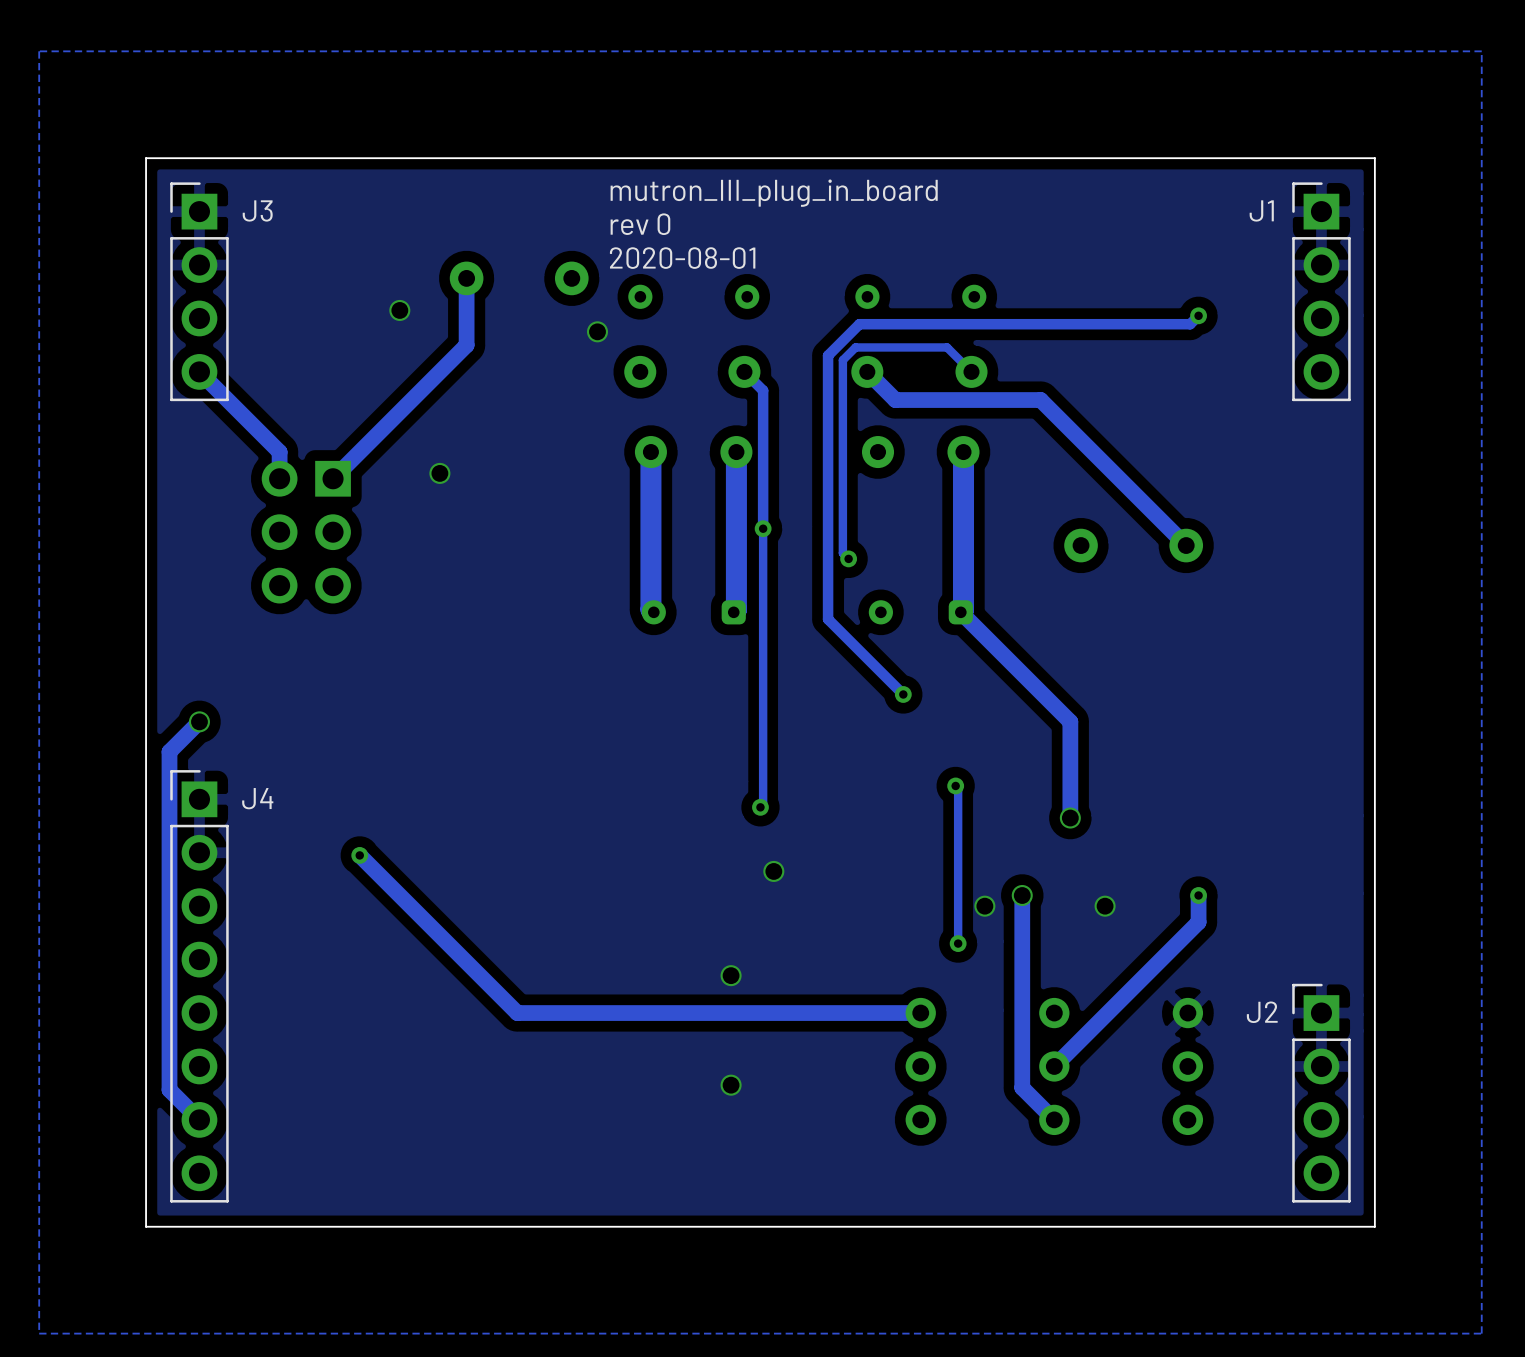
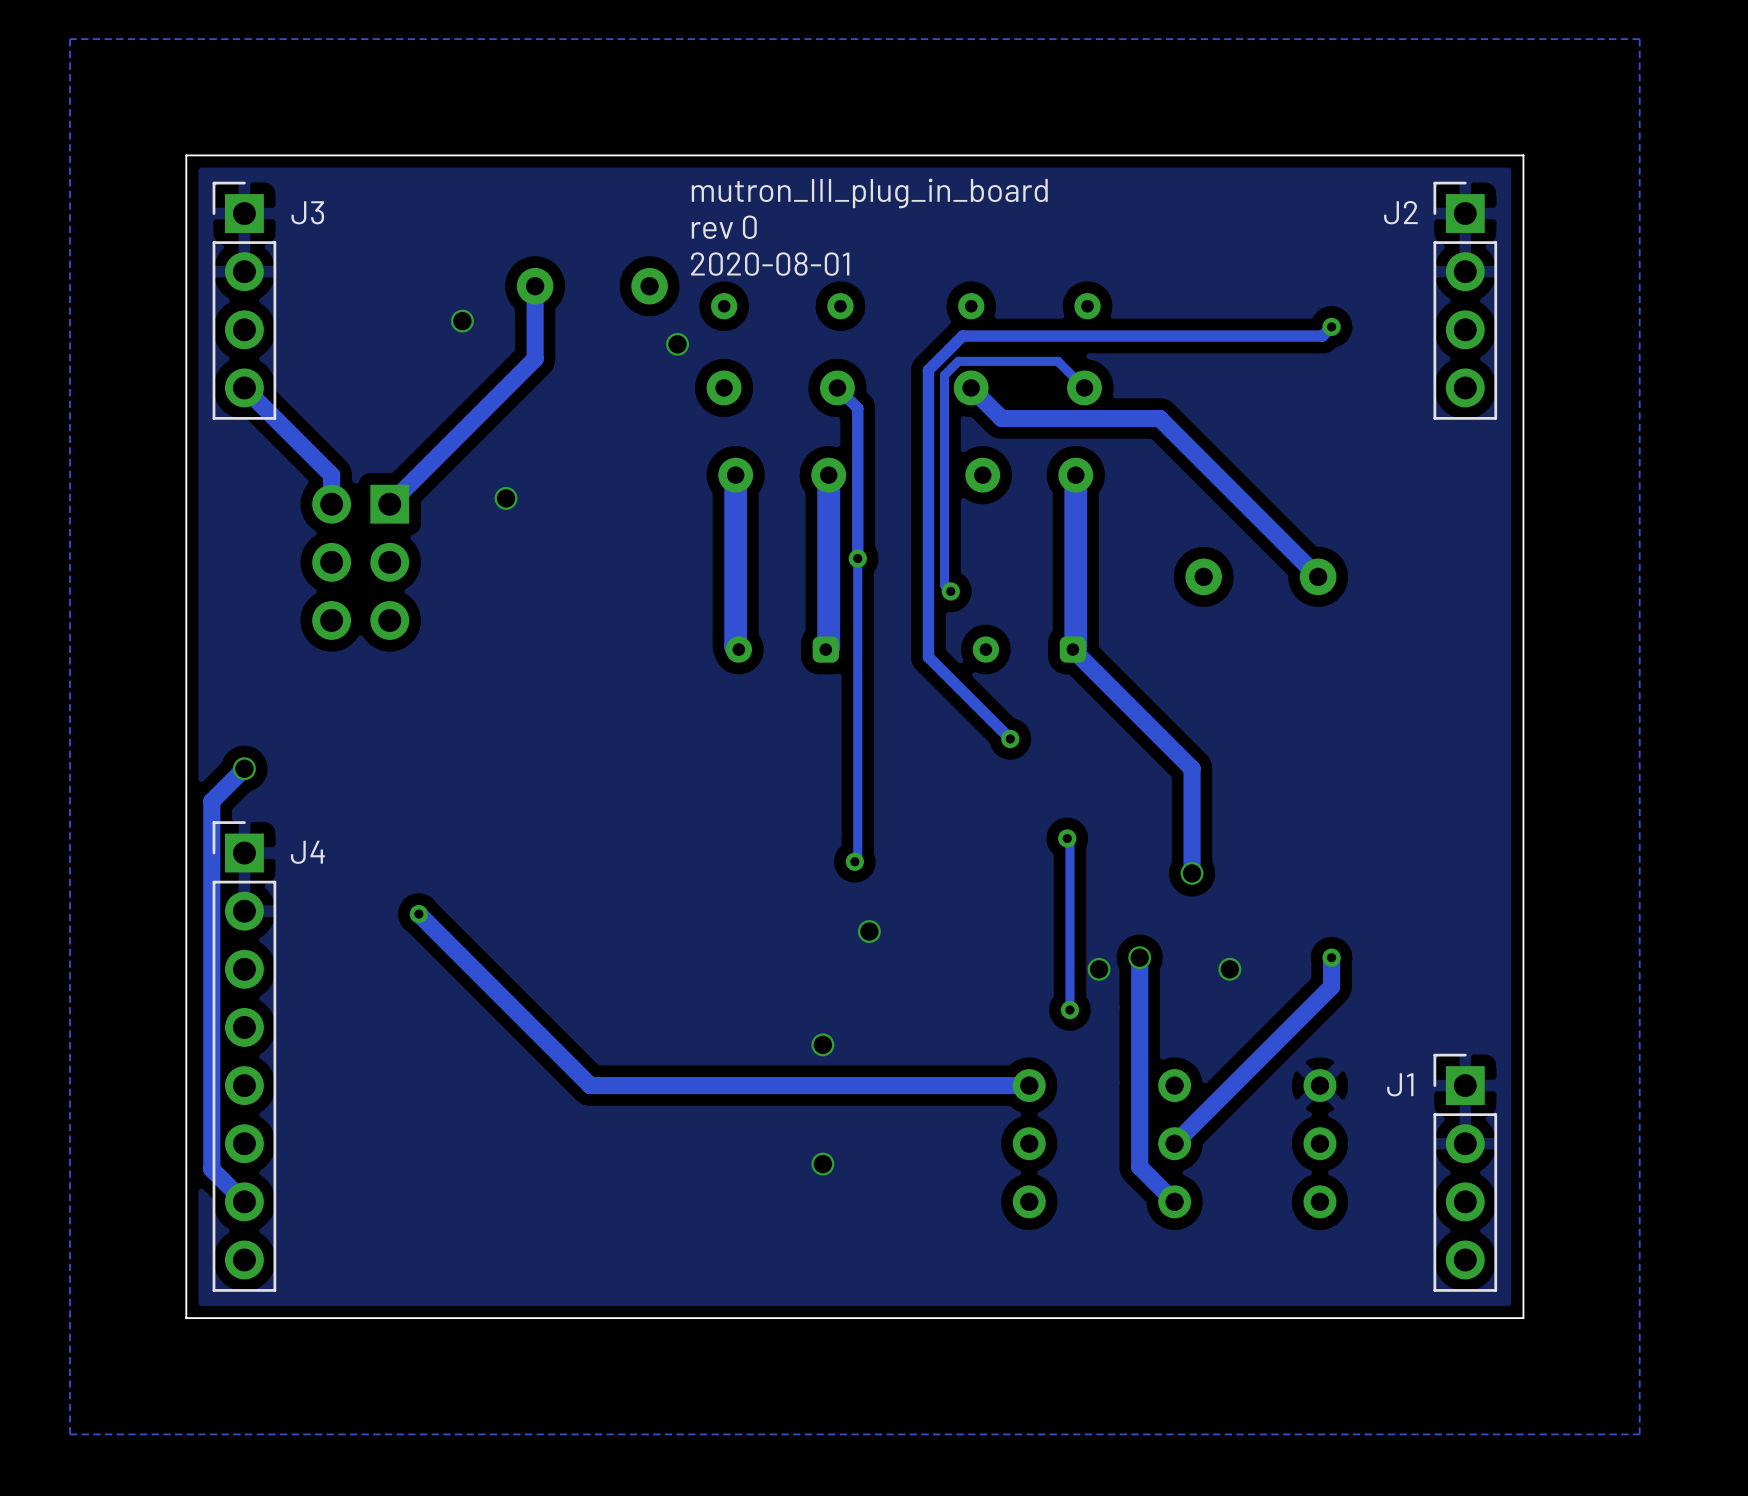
J1 name: J1 (1261, 210) -> J2 (1400, 212)
J2 name: J2 (1262, 1012) -> J1 (1400, 1084)

